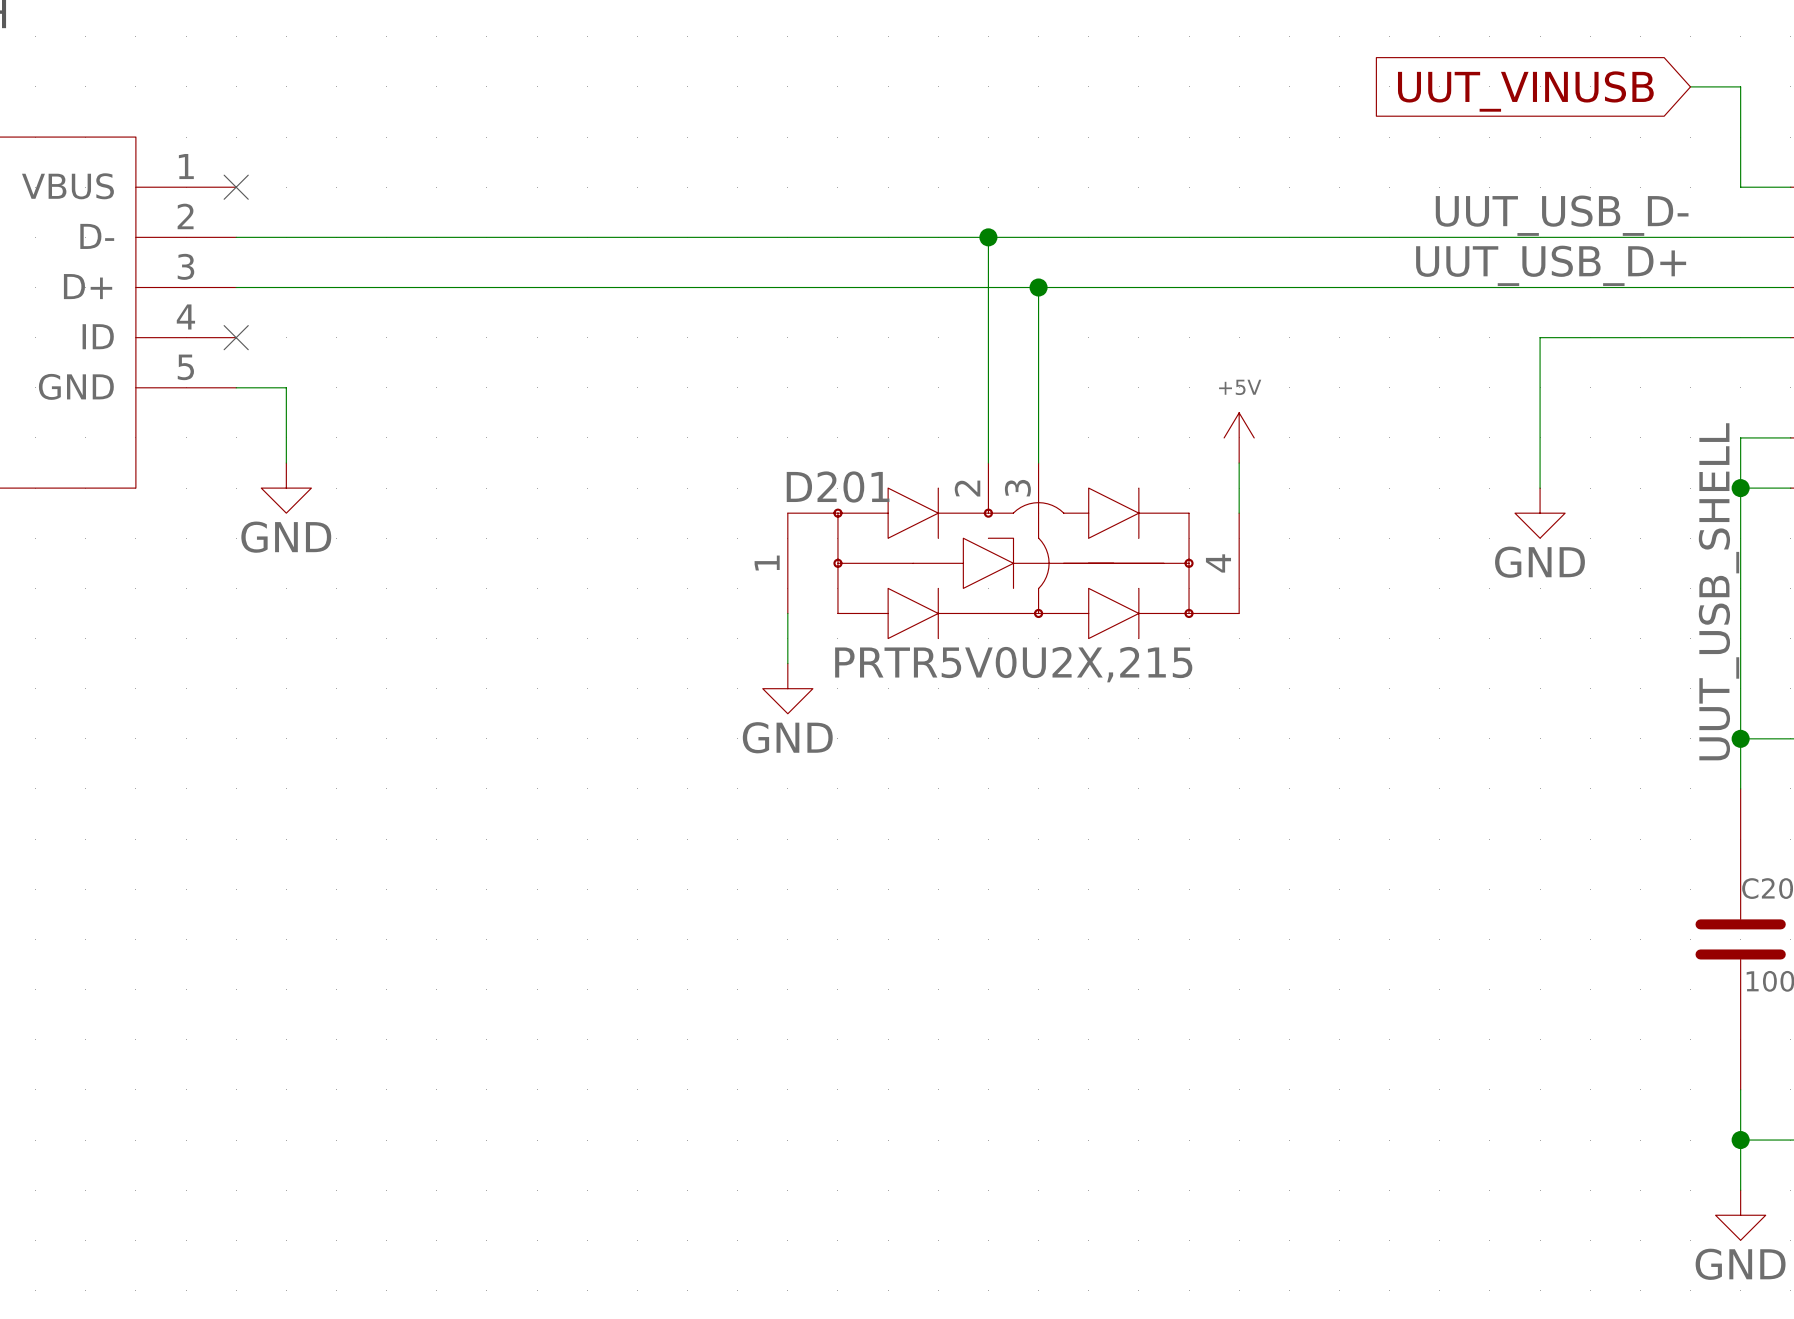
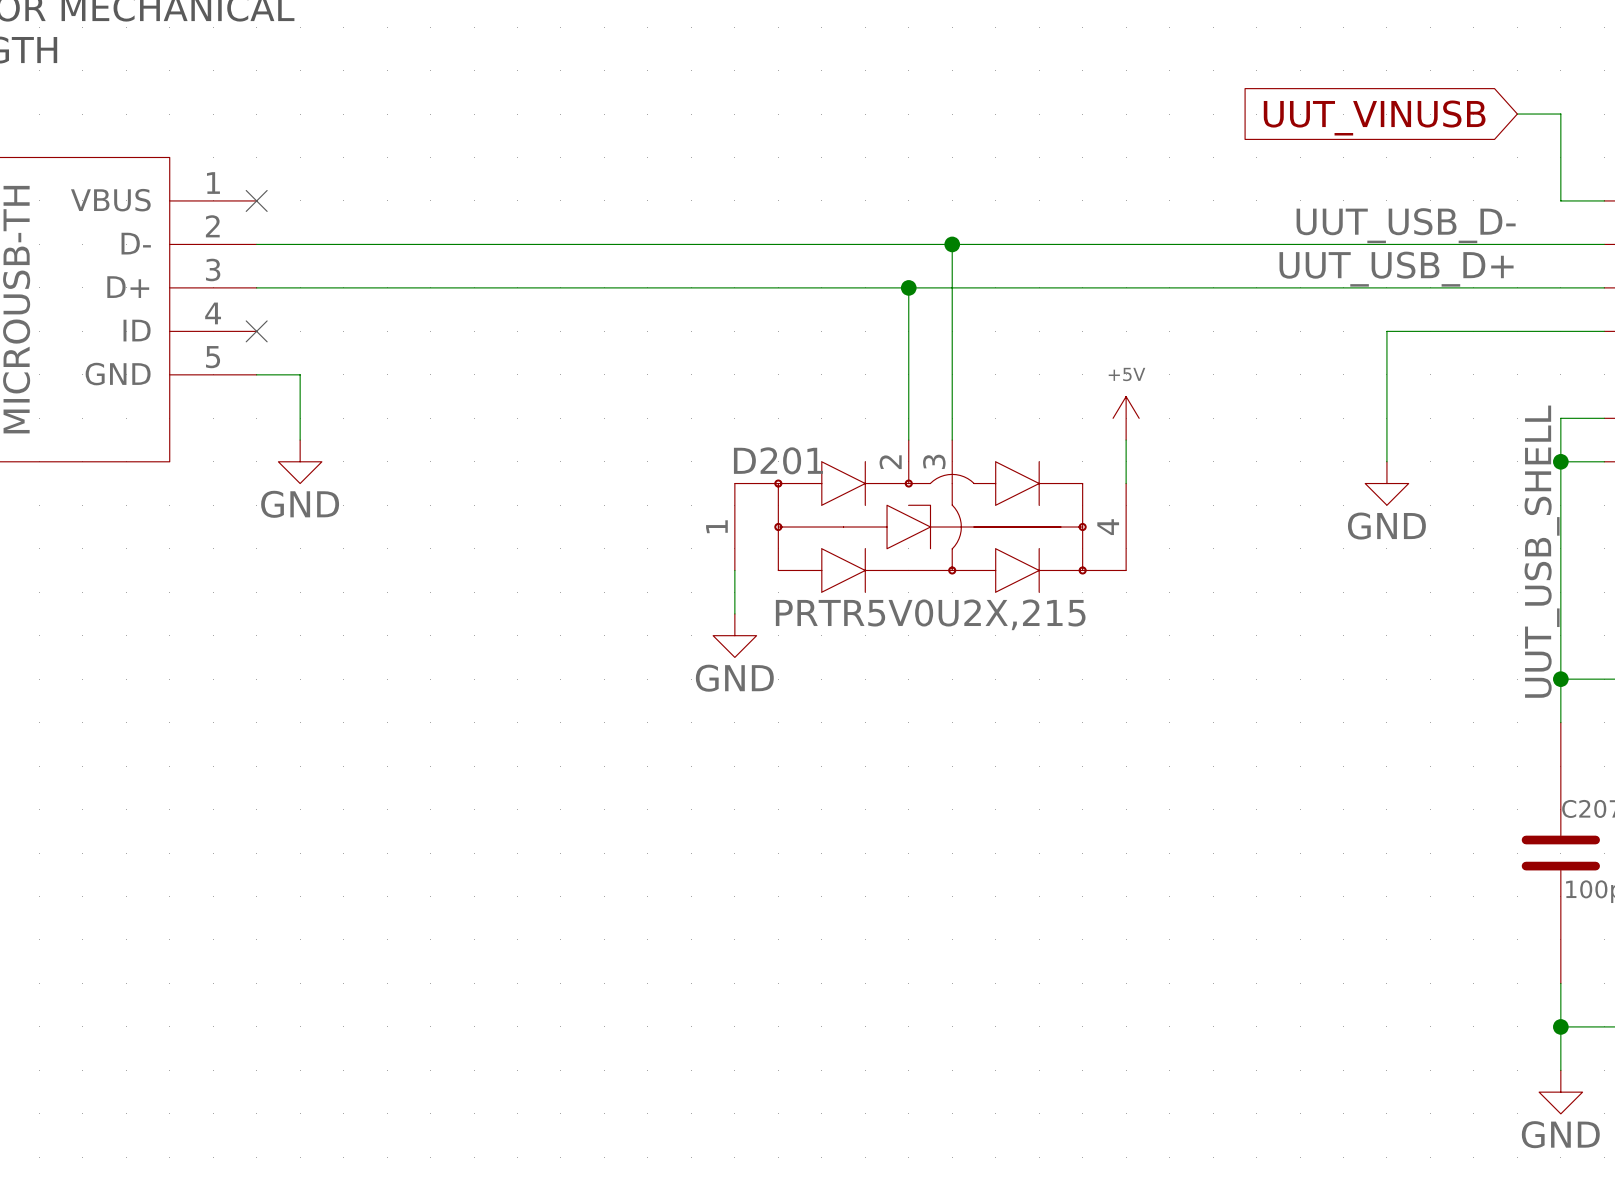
wire: (988, 237) (988, 287) -> (952, 244) (952, 287)
junction: (988, 237) -> none
junction: none -> (952, 244)
junction: none -> (908, 287)
junction: (1038, 287) -> none

